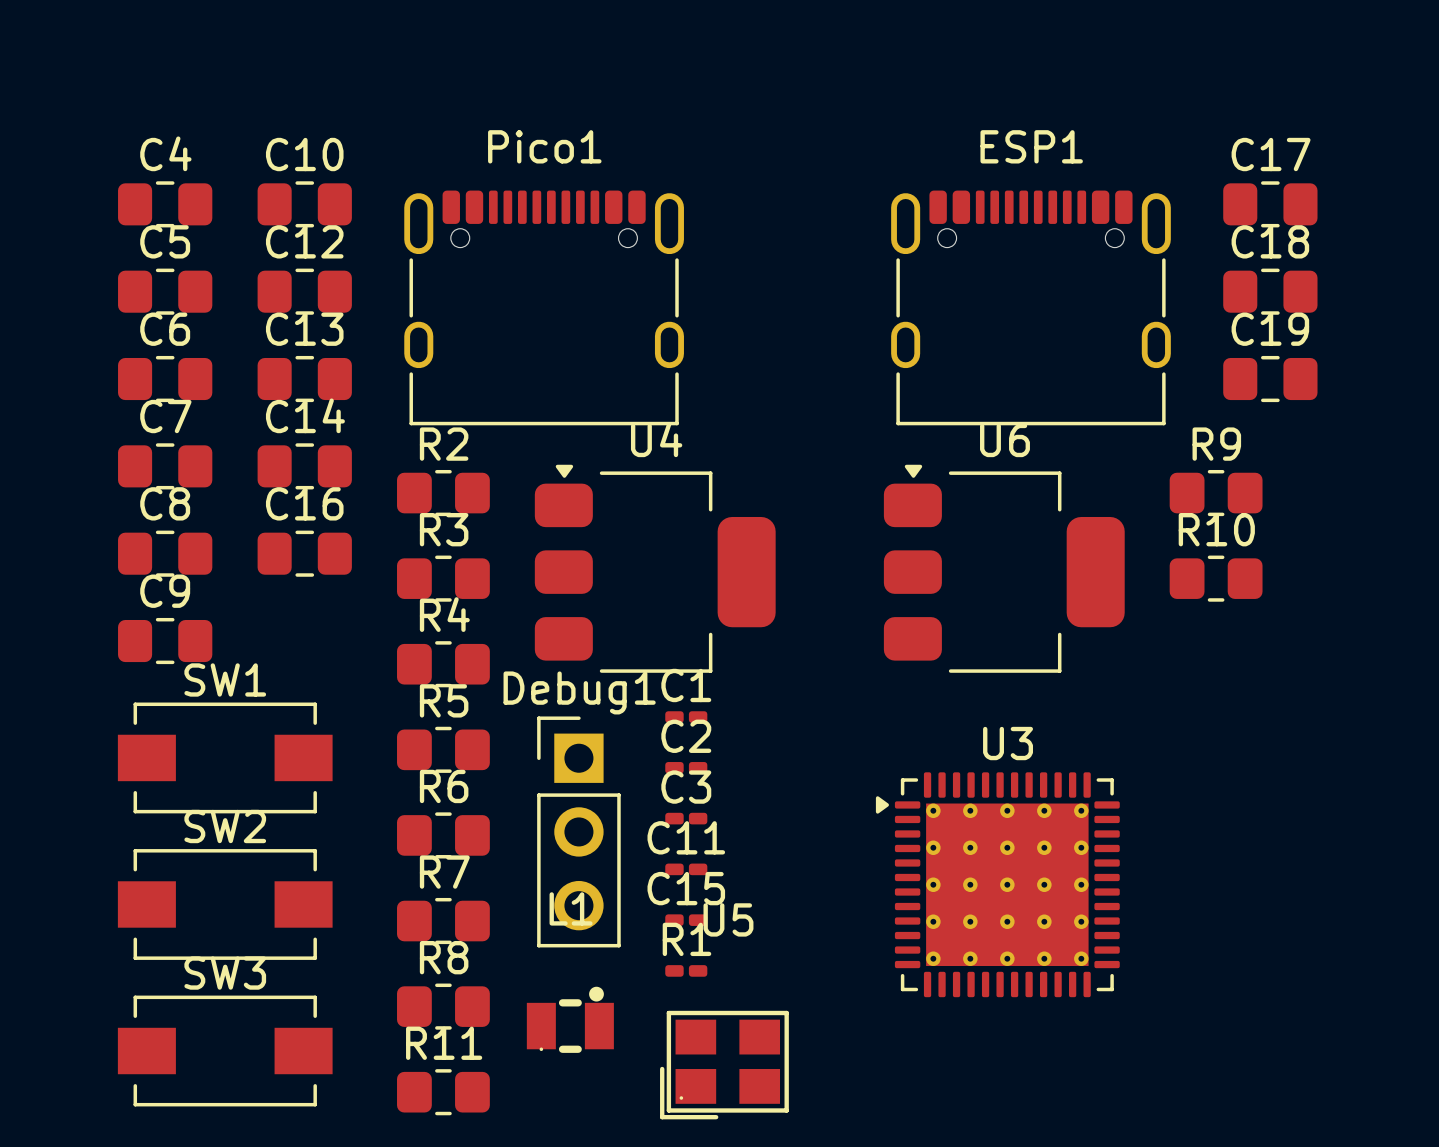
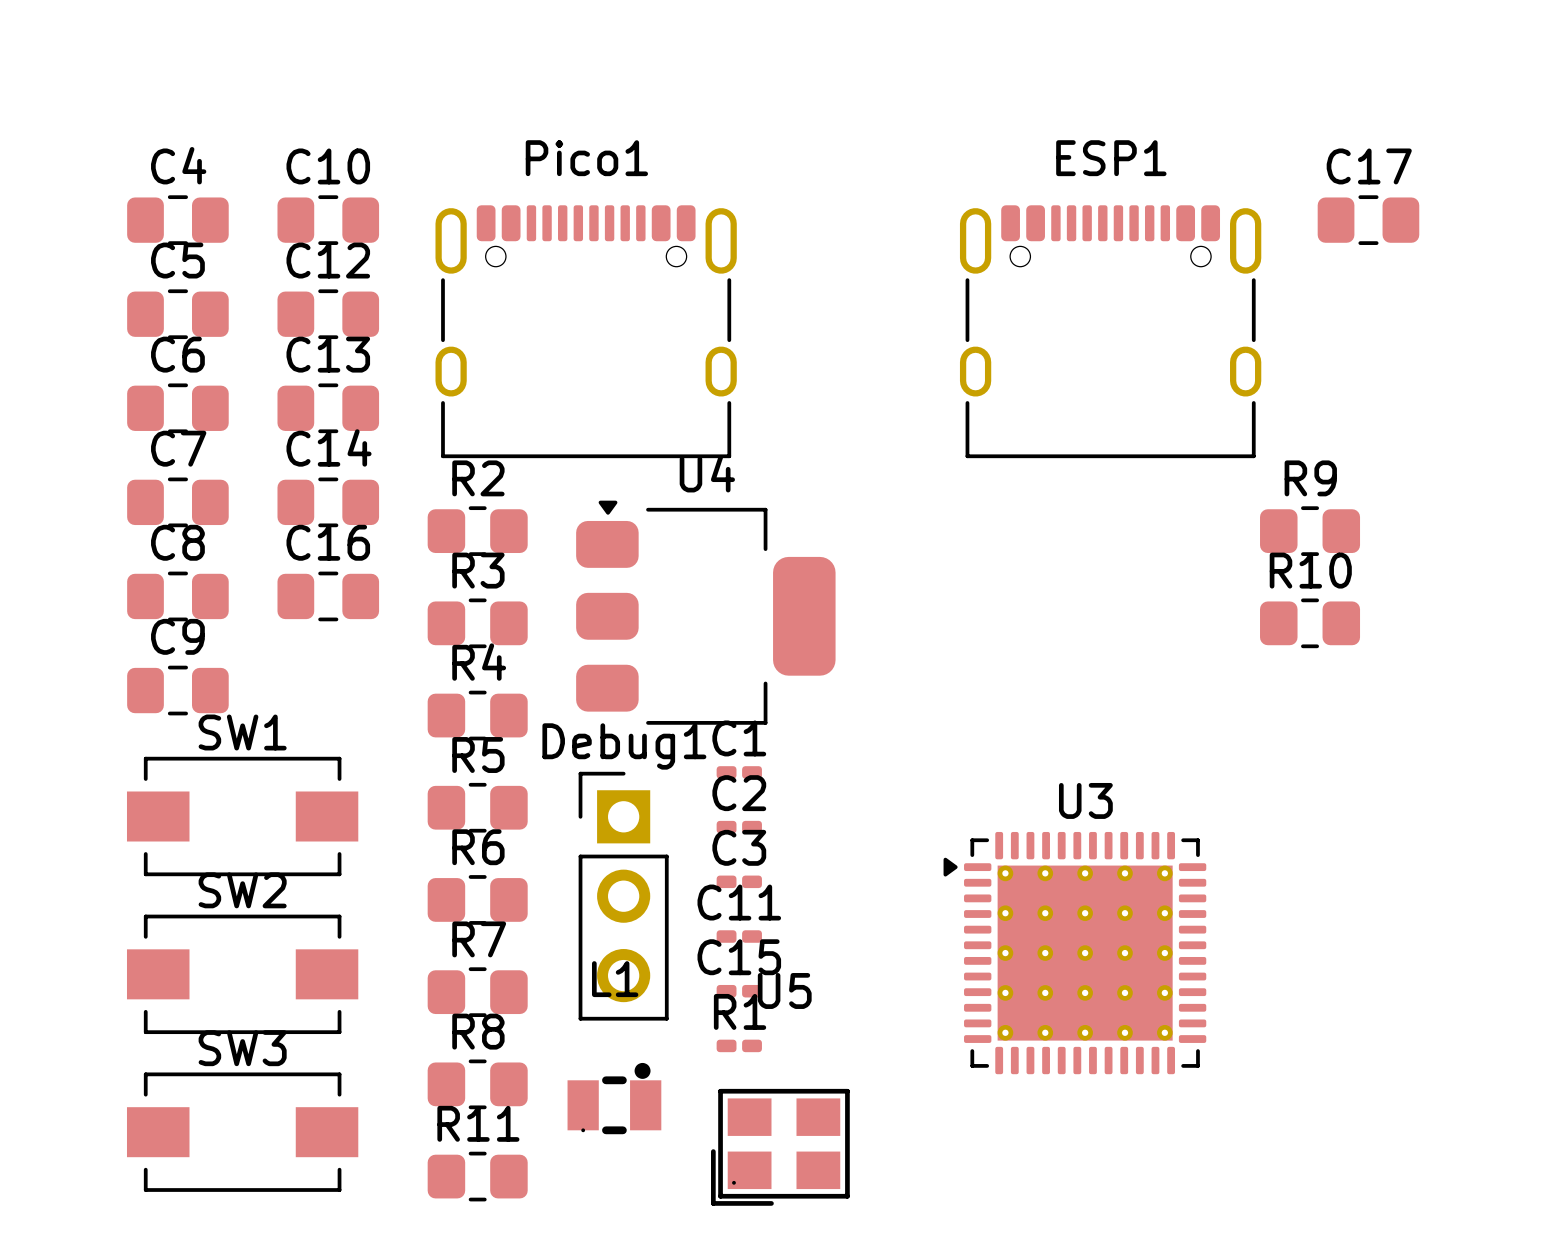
C18: (1270, 291) -> none
C19: (1270, 379) -> none
U6: (1004, 568) -> none

